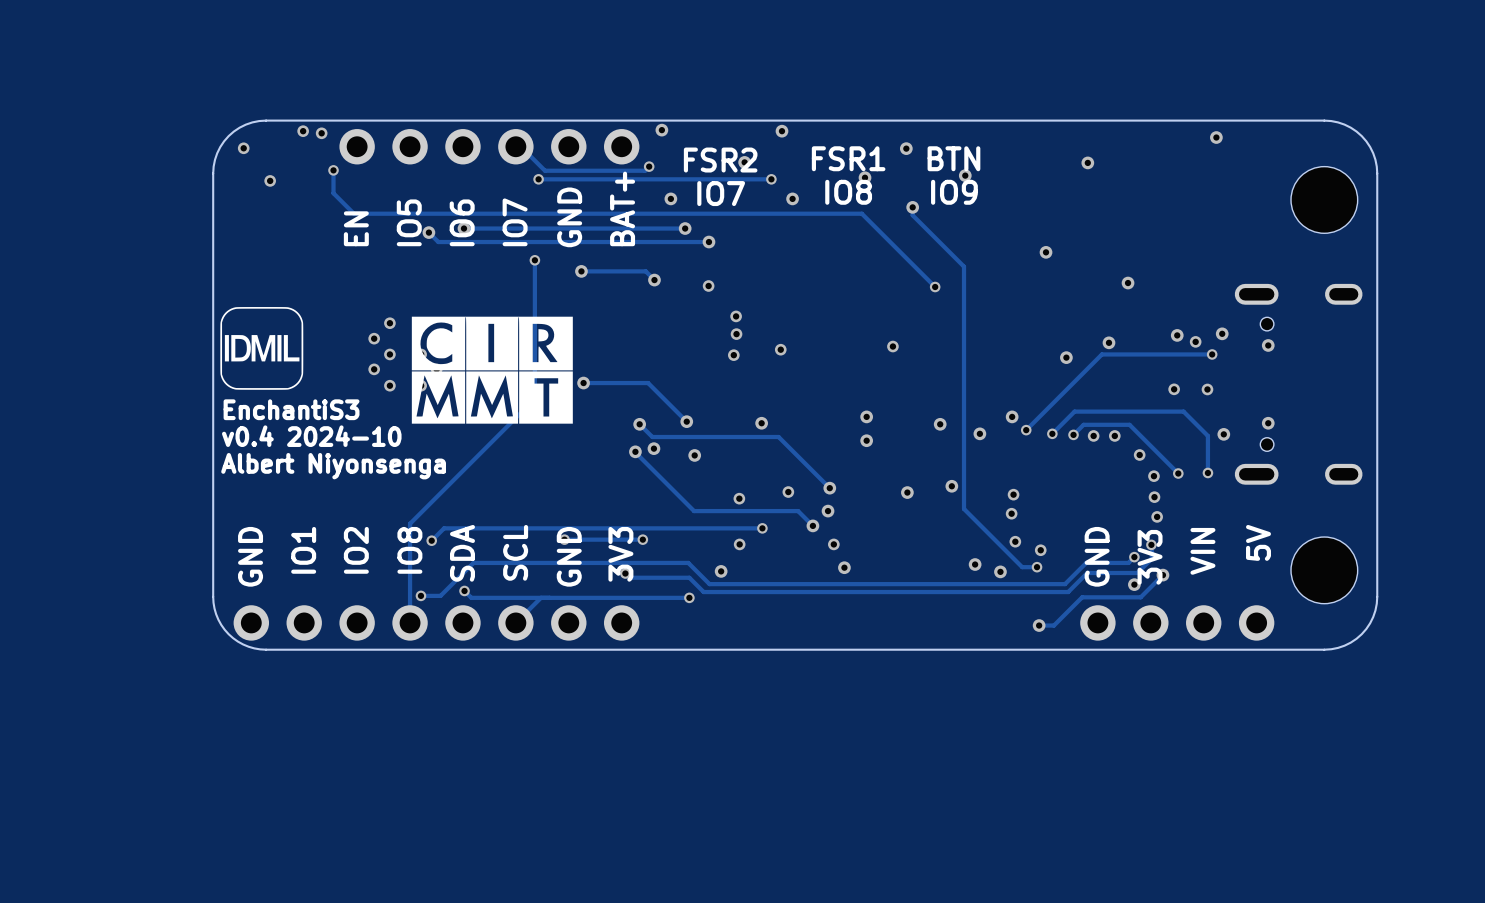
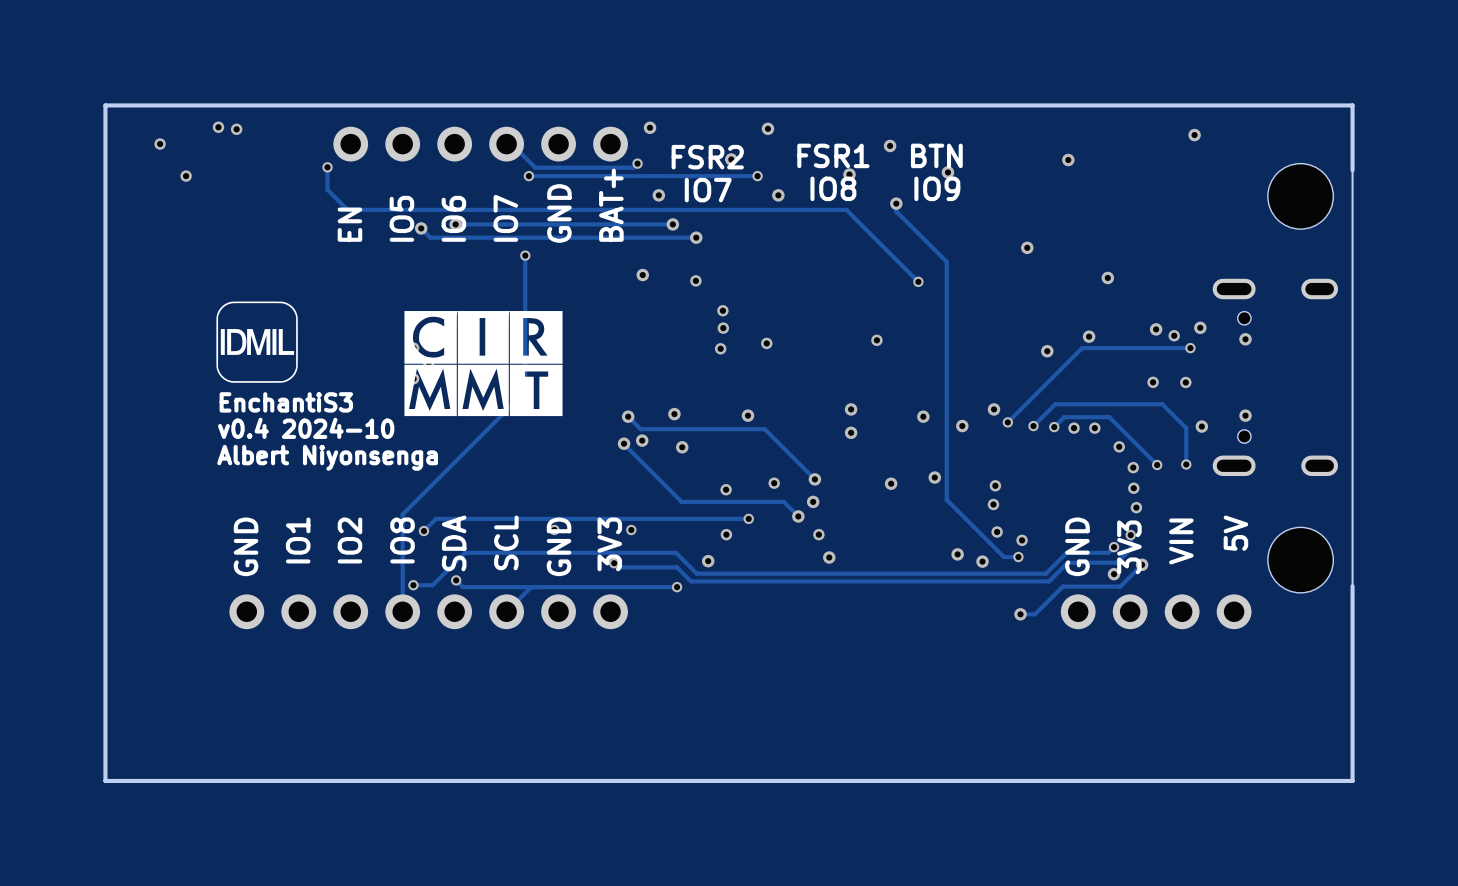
via: none -> (218, 127)
via: none -> (236, 129)
via: (303, 131) -> none
via: (321, 133) -> none
via: none -> (160, 144)
via: (243, 148) -> none
board edge: (1377, 173) (1373, 153) (1361, 136) (1344, 124) (1324, 120) (266, 120) (245, 124) (228, 136) (217, 153) (213, 173) (213, 602) (218, 619) (224, 629) (233, 638) (248, 646) (266, 649) (1324, 649) (1344, 645) (1361, 634) (1373, 617) (1377, 596) -> (1352, 170) (1352, 105) (105, 105) (105, 780) (1352, 780) (1352, 586)
via: none -> (186, 176)
via: (270, 180) -> none
track: (581, 271) (645, 271) (654, 280) -> none
via: (581, 271) -> none
via: (389, 323) -> none
via: (374, 338) -> none
via: (389, 354) -> none
via: (374, 369) -> none
track: (583, 383) (648, 383) (686, 421) -> none
via: (583, 383) -> none
via: (389, 385) -> none
track: (642, 539) (564, 539) -> none

